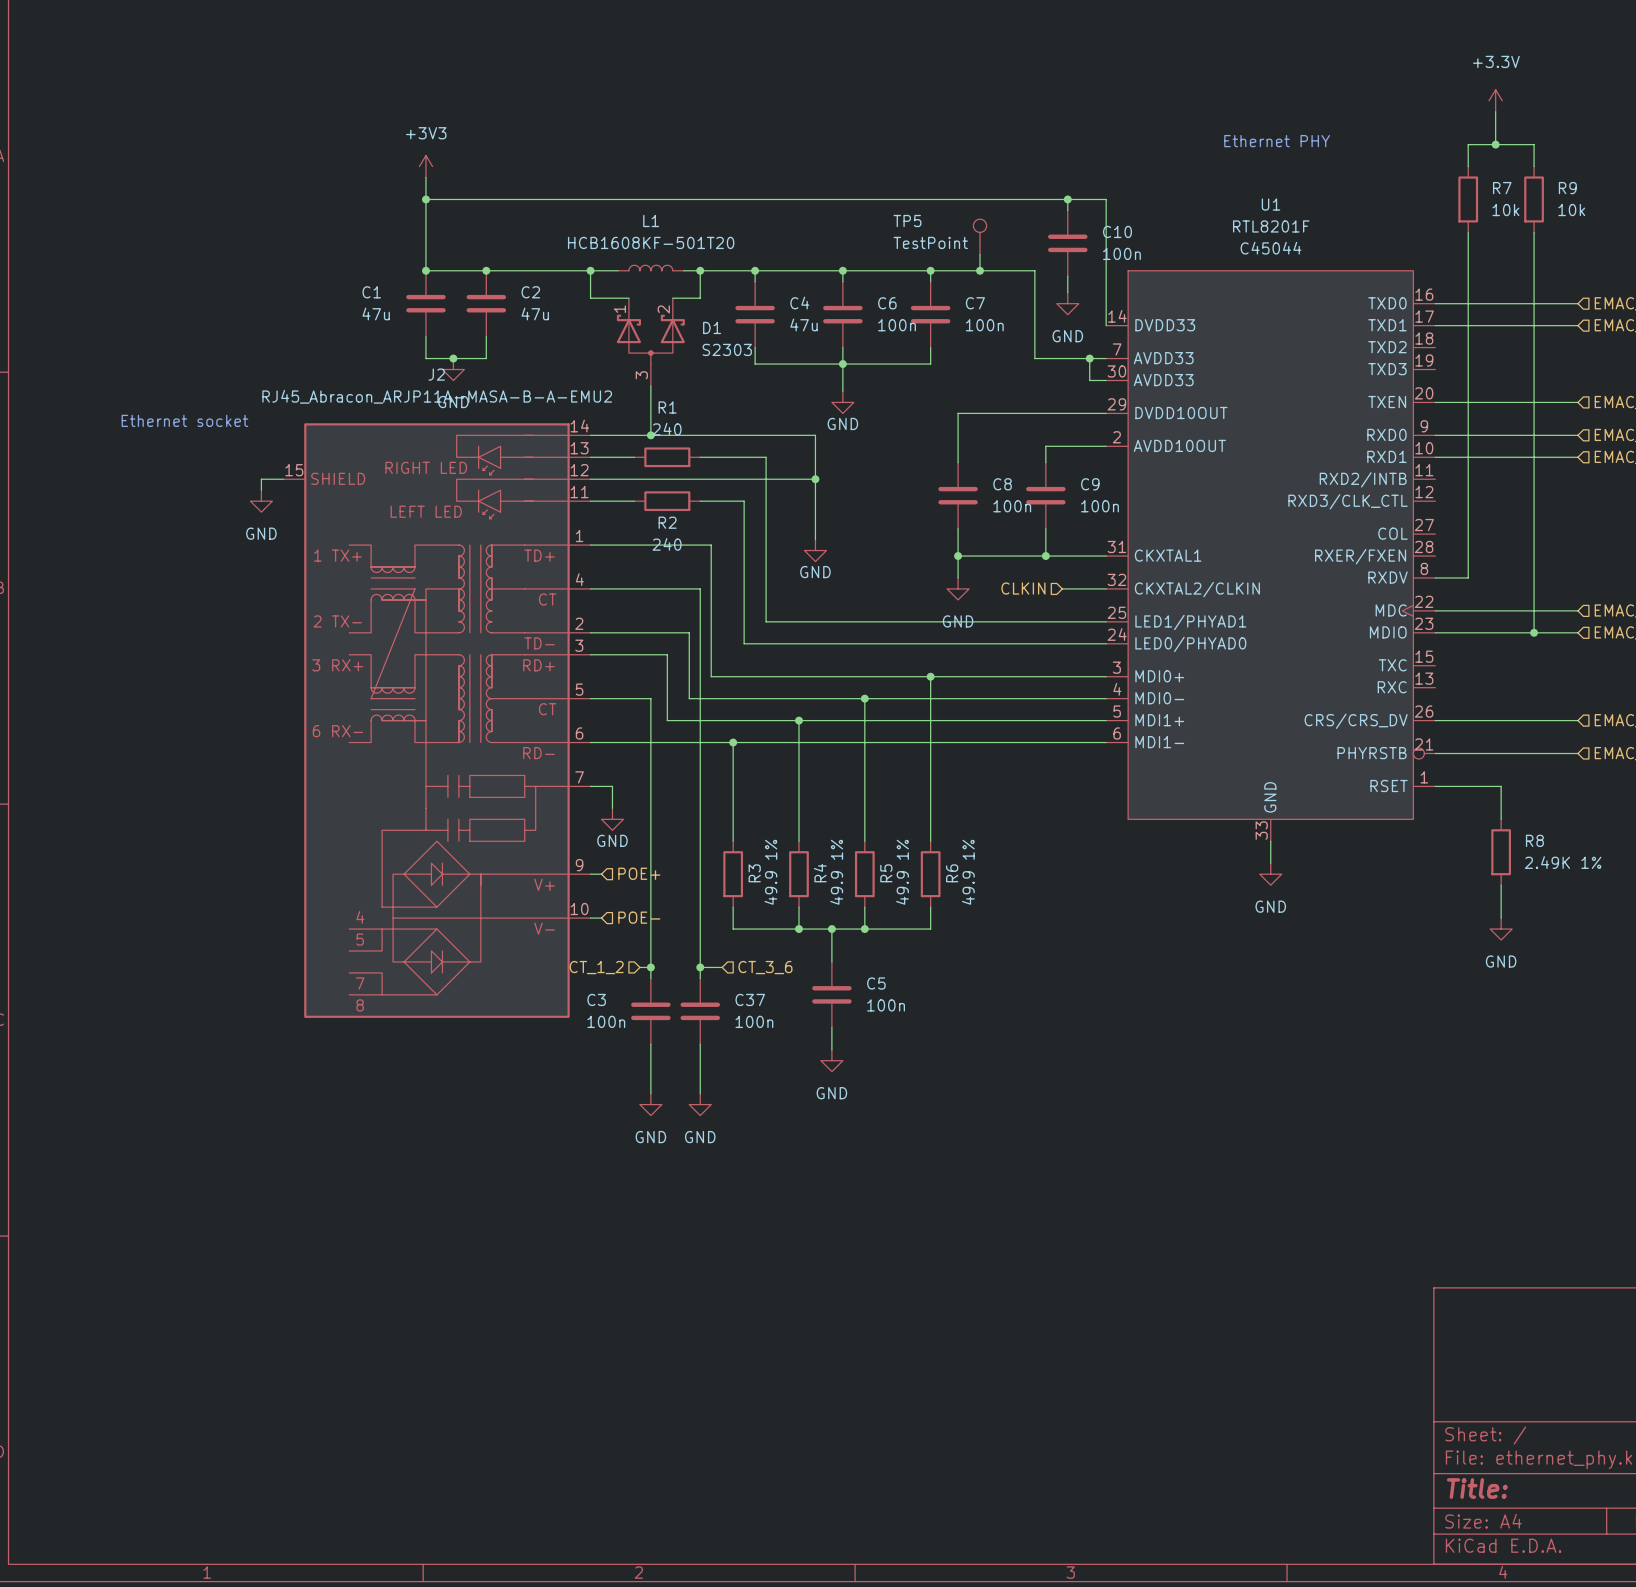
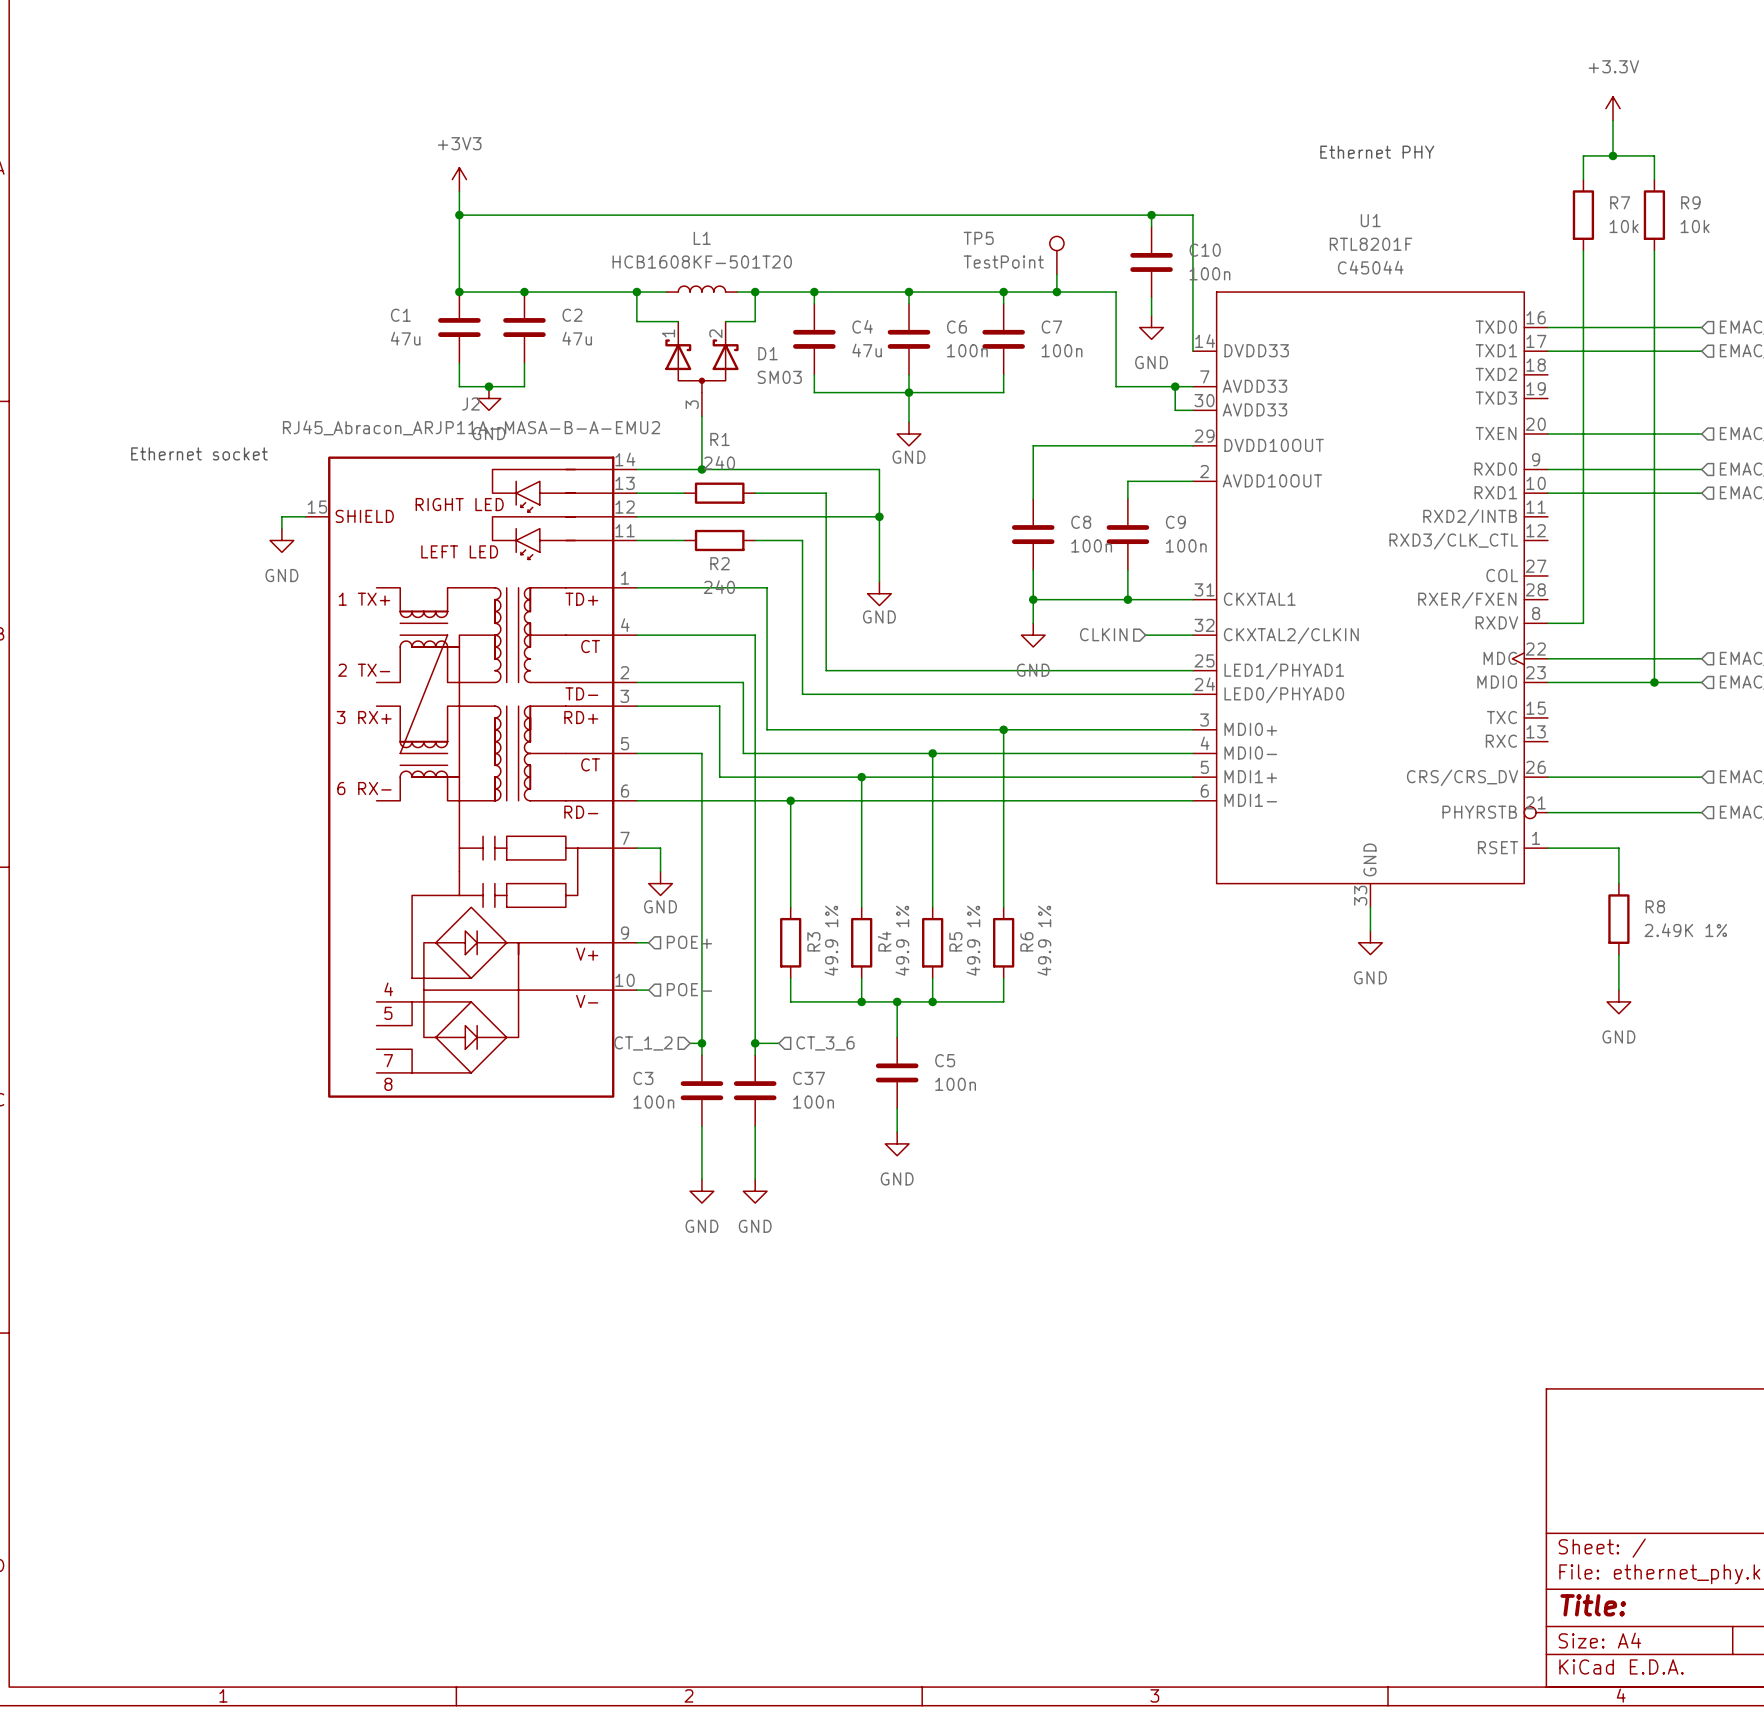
D1 value: S2303 (727, 349) -> SM03 (779, 377)

